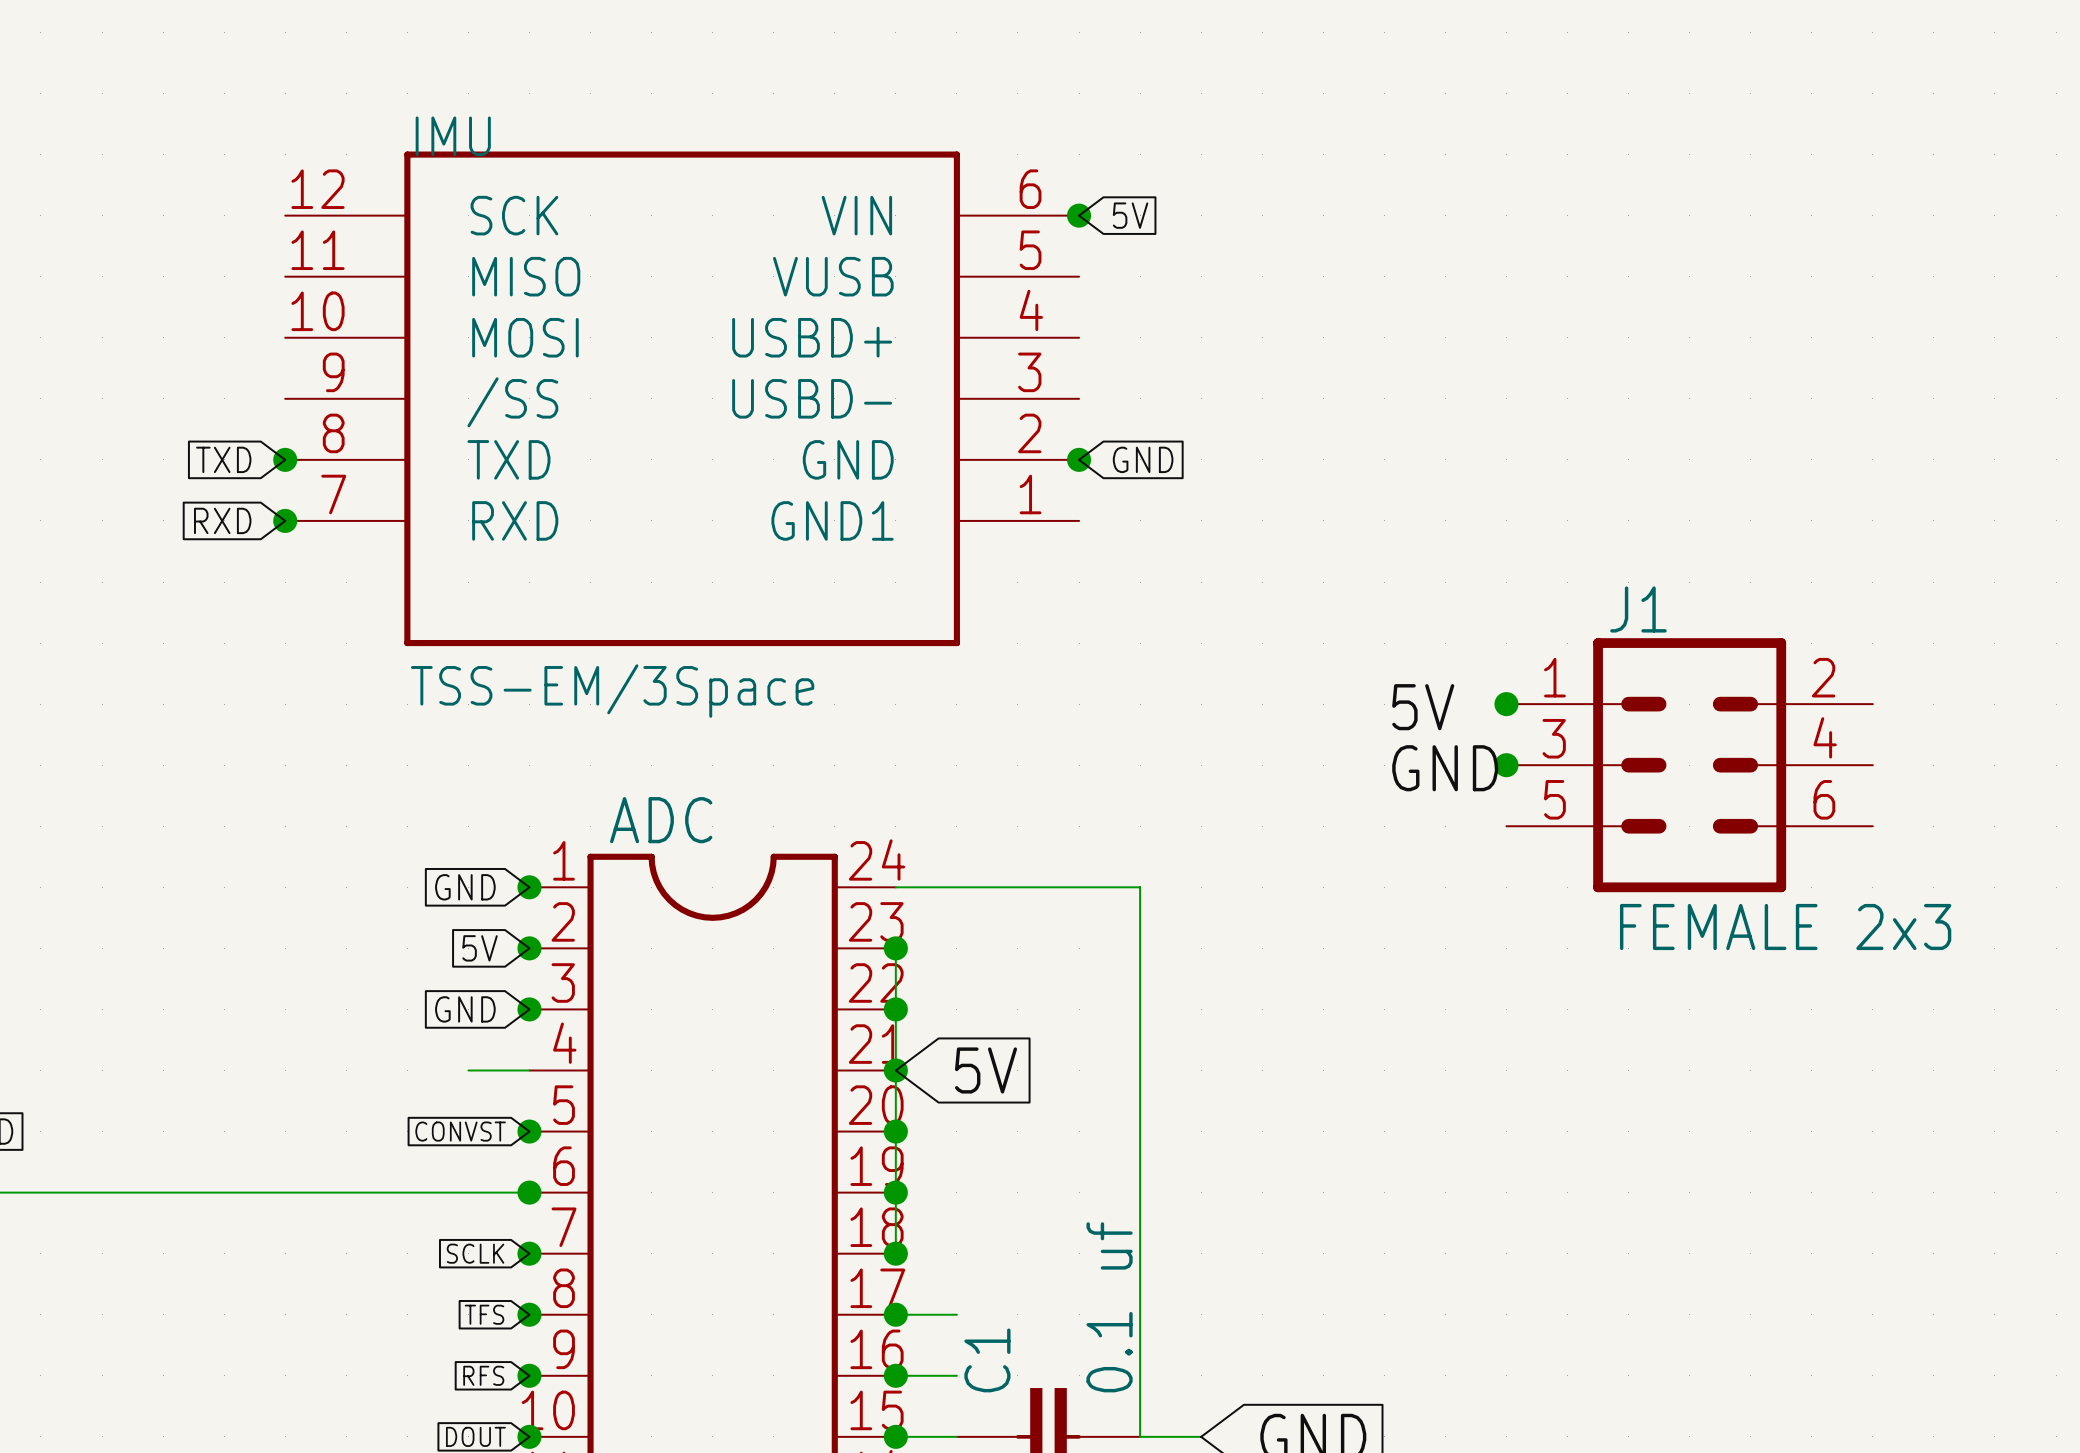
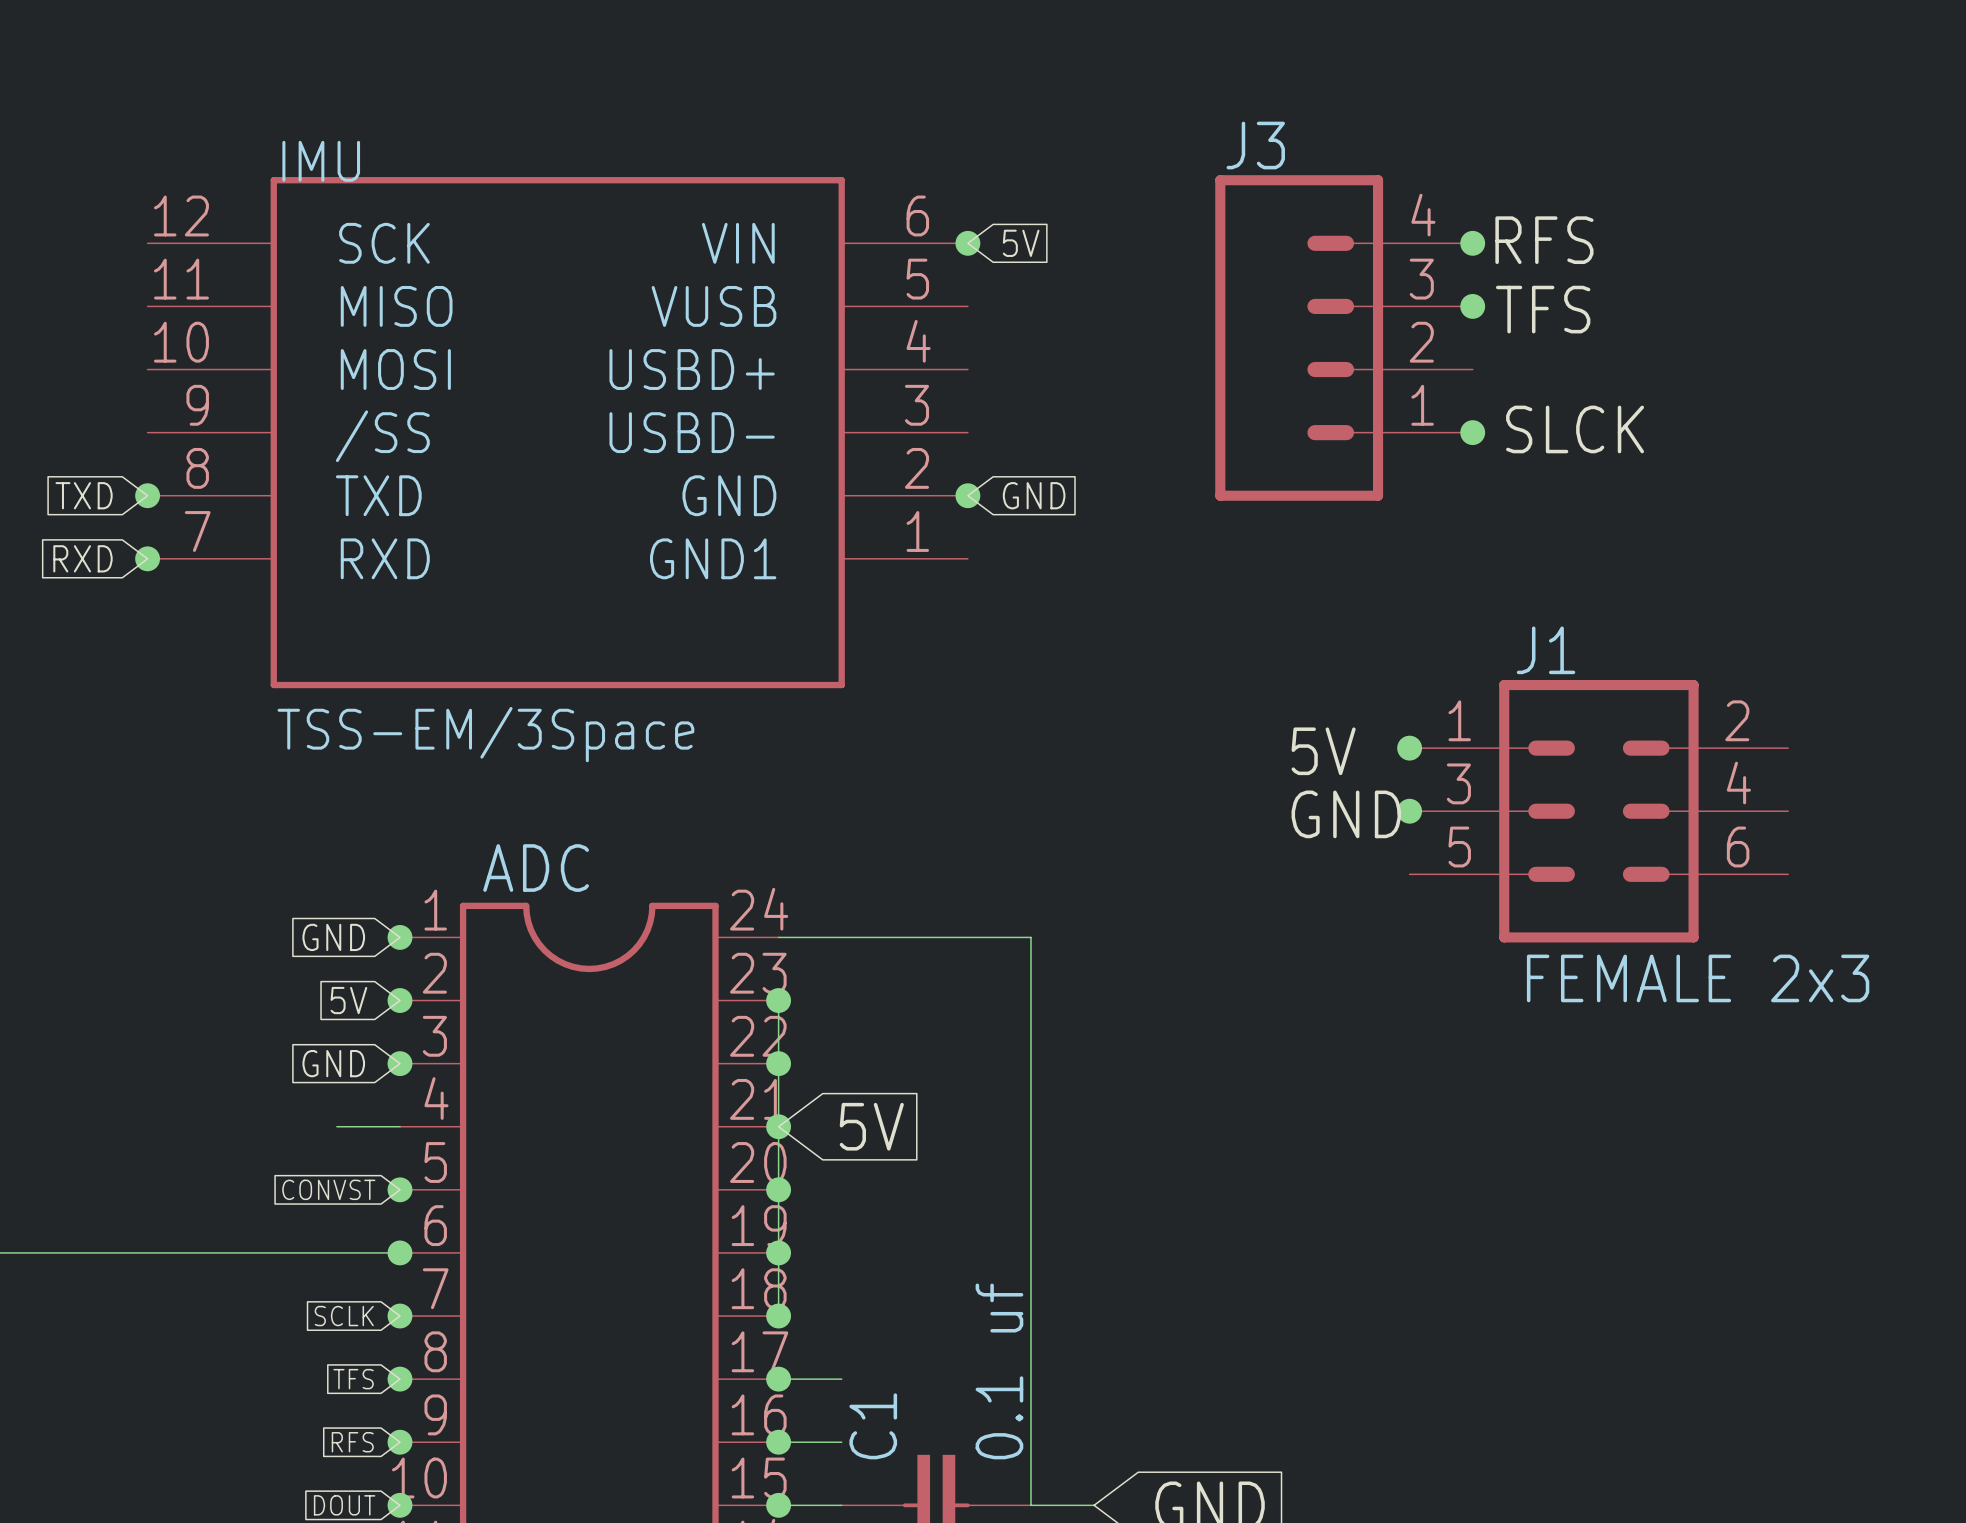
label: none -> RFS (1544, 240)
junction: none -> (1472, 243)
junction: none -> (1472, 306)
label: none -> TFS (1543, 309)
J3: none -> (1343, 337)
label: none -> SLCK (1575, 429)
junction: none -> (1472, 432)

